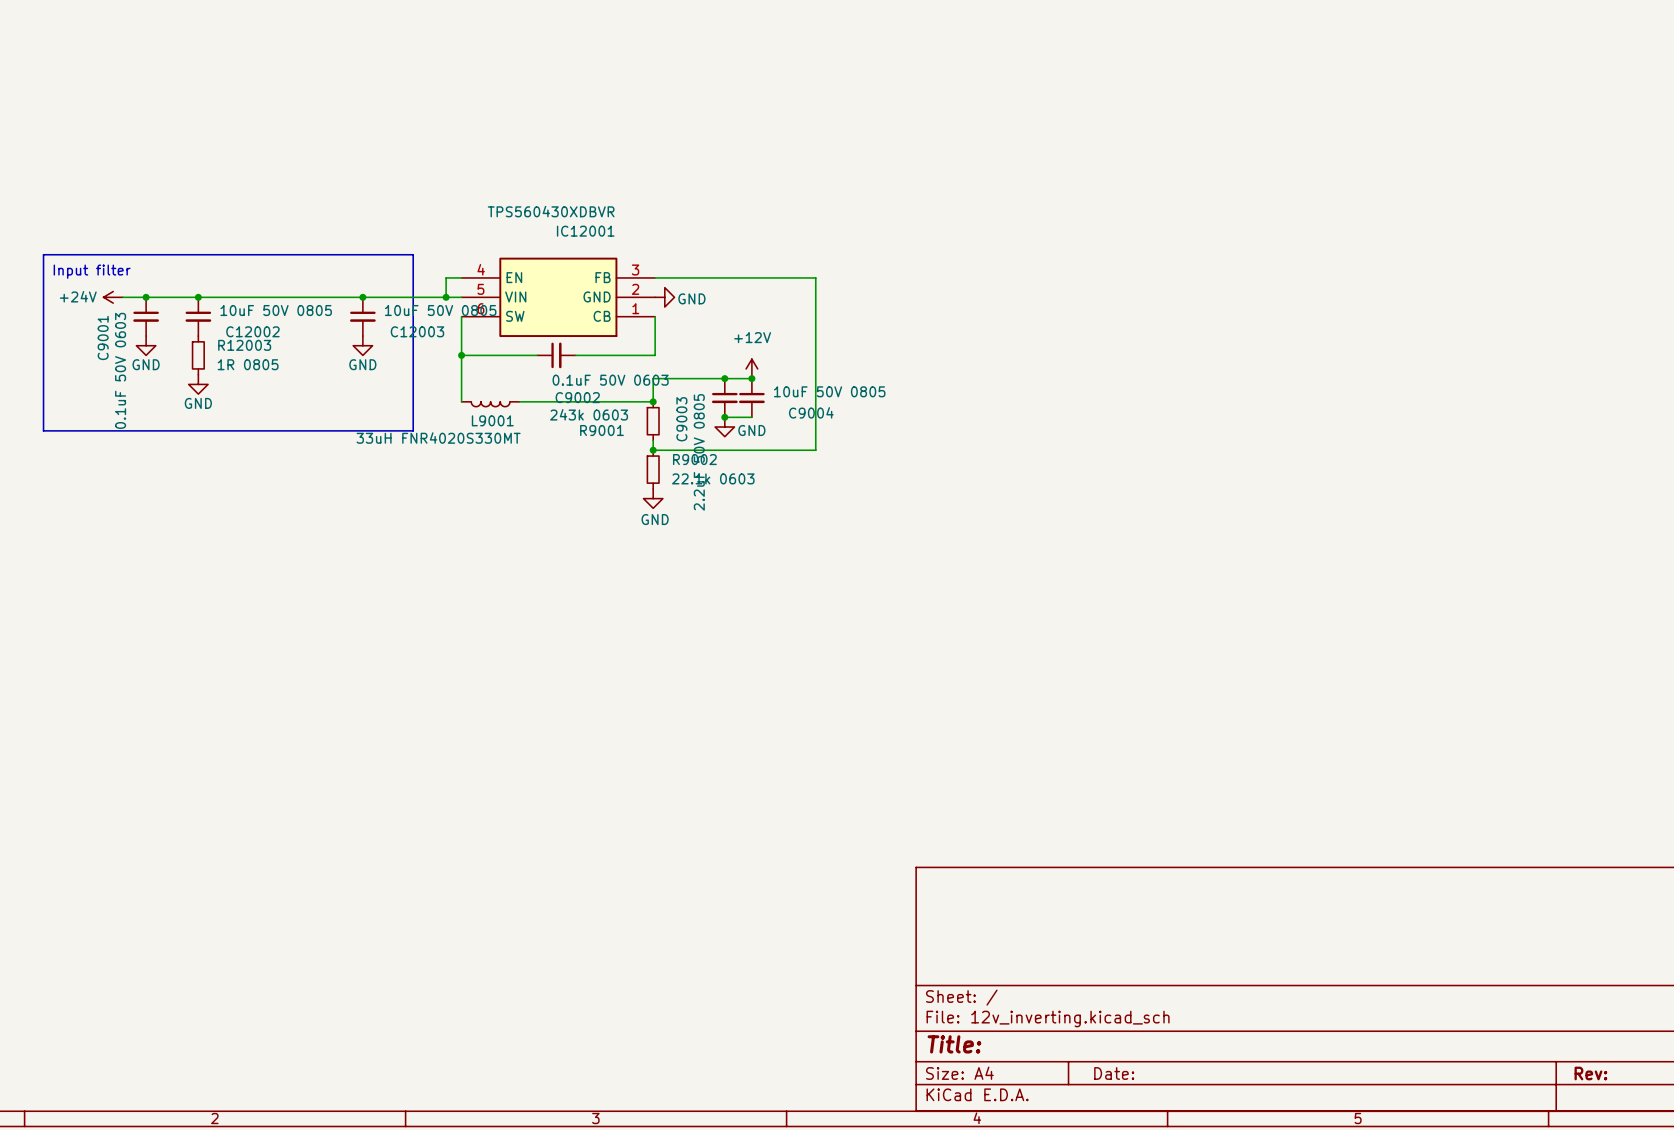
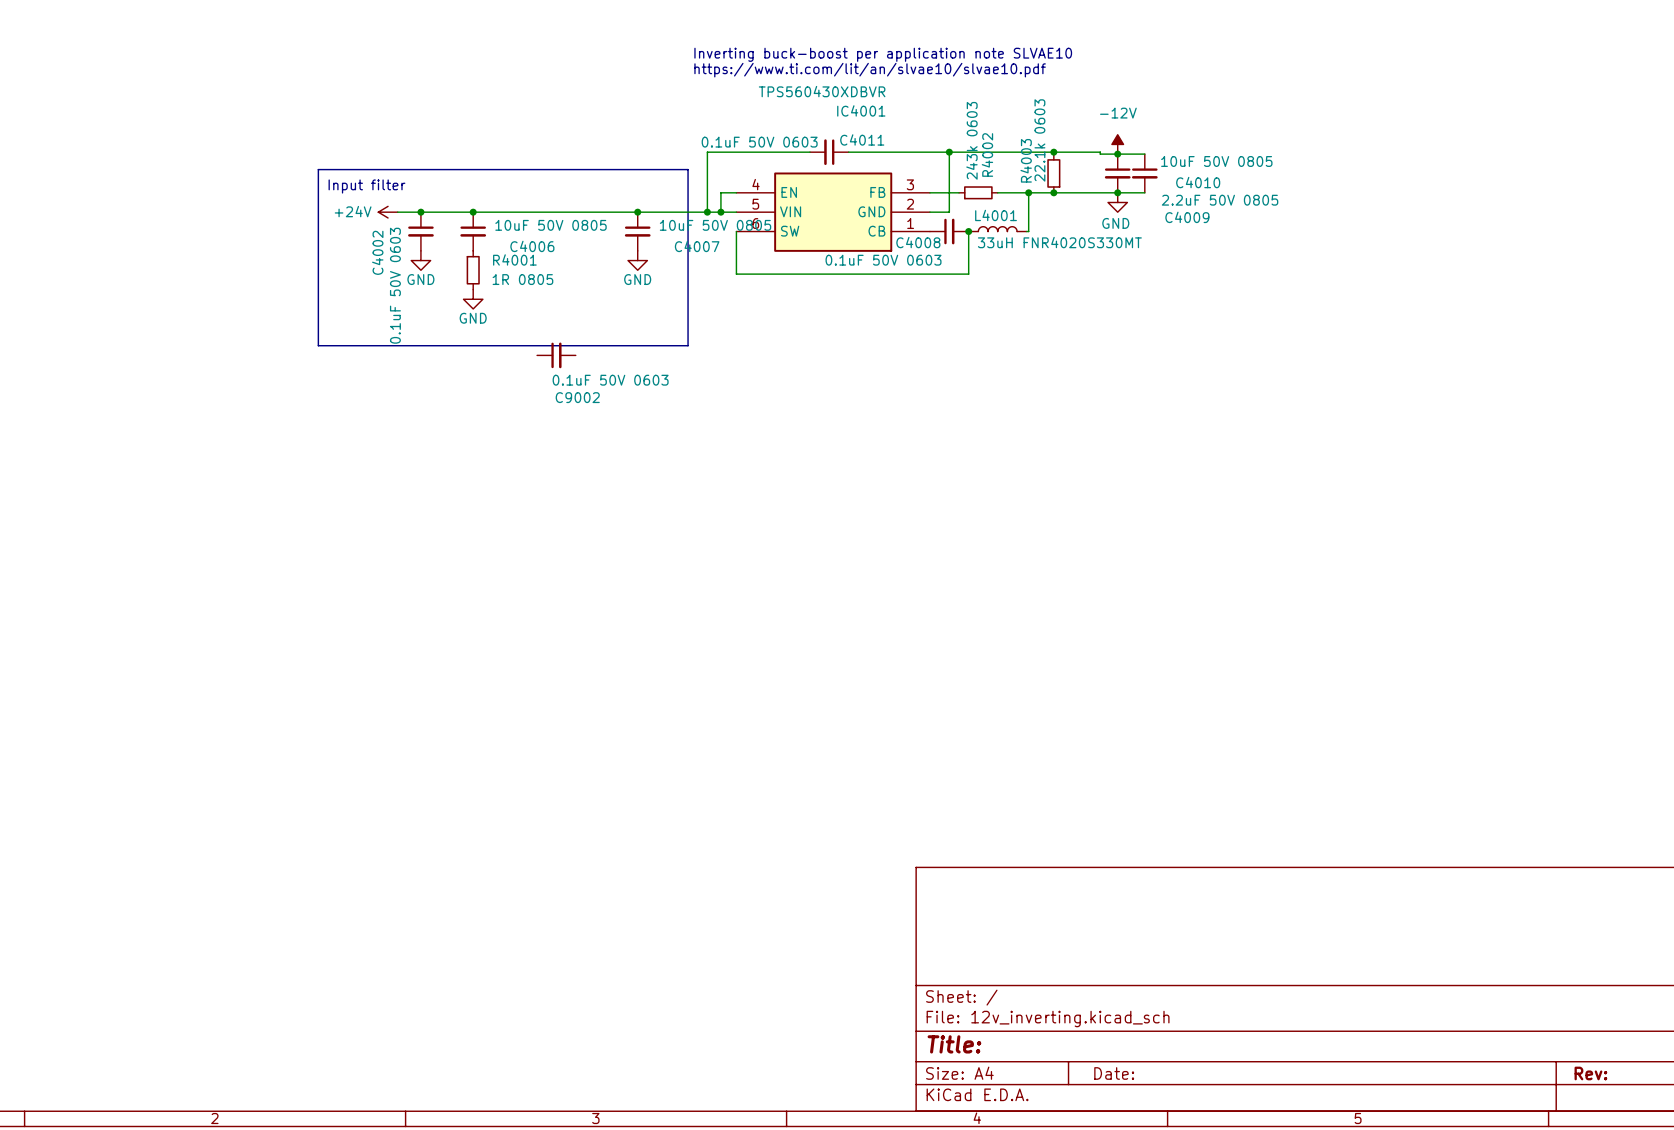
text: none -> Inverting buck-boost per application note SLVAE10 (883, 54)
text: none -> https://www.ti.com/lit/an/slvae10/slvae10.pdf (870, 70)
power symbol: none -> -12V (1117, 144)
wire: none -> (809, 152) (707, 152) (707, 212)
C4011: none -> 0.1uF 50V 0603 (829, 152)
wire: none -> (848, 152) (1100, 152) (1100, 154) (1144, 154)
wire: none -> (949, 152) (949, 212) (929, 212)
junction: none -> (949, 152)
junction: none -> (1053, 152)
junction: none -> (1117, 154)
line: none -> (318, 169) (688, 169) (688, 345) (318, 345) (318, 169)
R4003: none -> 22.1k 0603 (1053, 173)
C4009: none -> 2.2uF 50V 0805 (1117, 173)
C4010: none -> 10uF 50V 0805 (1144, 173)
text: none -> Input filter (366, 186)
wire: none -> (736, 192) (720, 192) (720, 212)
wire: none -> (929, 192) (959, 192)
R4002: none -> 243k 0603 (978, 192)
wire: none -> (997, 192) (1144, 192)
wire: none -> (1028, 192) (1028, 231) (1026, 231)
junction: none -> (1028, 192)
junction: none -> (1053, 192)
junction: none -> (1117, 192)
power symbol: none -> GND (1117, 202)
power symbol: none -> +24V (388, 212)
wire: none -> (397, 212) (736, 212)
junction: none -> (420, 212)
junction: none -> (473, 212)
junction: none -> (637, 212)
junction: none -> (707, 212)
junction: none -> (720, 212)
IC4001: none -> TPS560430XDBVR (833, 212)
L4001: none -> 33uH FNR4020S330MT (997, 229)
C4002: none -> 0.1uF 50V 0603 (420, 231)
C4006: none -> 10uF 50V 0805 (473, 231)
C4007: none -> 10uF 50V 0805 (637, 231)
wire: none -> (736, 231) (736, 274) (968, 274) (968, 231)
C4008: none -> 0.1uF 50V 0603 (949, 231)
junction: none -> (968, 231)
line: (43, 254) (413, 254) (413, 430) (43, 430) (43, 254) -> none
power symbol: none -> GND (420, 260)
R4001: none -> 1R 0805 (473, 270)
text: Input filter (92, 271) -> none
wire: (461, 277) (446, 277) (446, 297) -> none
wire: (655, 277) (815, 277) (815, 450) (653, 450) (653, 440) -> none
power symbol: +24V (113, 297) -> none
wire: (122, 297) (461, 297) -> none
junction: (146, 297) -> none
junction: (198, 297) -> none
junction: (362, 297) -> none
junction: (446, 297) -> none
IC12001: TPS560430XDBVR (558, 297) -> none
power symbol rotation: 0° (664, 297) -> 90° clockwise (637, 260)
power symbol position: GND (664, 297) -> GND (637, 260)
power symbol: none -> GND (473, 299)
C9001: 0.1uF 50V 0603 (146, 316) -> none
C12002: 10uF 50V 0805 (198, 316) -> none
C12003: 10uF 50V 0805 (362, 316) -> none
wire: (461, 316) (461, 401) -> none
wire: (655, 316) (655, 355) (575, 355) -> none
power symbol: GND (146, 345) -> none
power symbol: GND (362, 345) -> none
R12003: 1R 0805 (198, 355) -> none
wire: (461, 355) (537, 355) -> none
junction: (461, 355) -> none
power symbol: +12V (751, 368) -> none
junction: (724, 378) -> none
wire: (751, 378) (653, 378) (653, 401) (519, 401) -> none
junction: (751, 378) -> none
power symbol: GND (198, 384) -> none
C9003: 2.2uF 50V 0805 (724, 397) -> none
C9004: 10uF 50V 0805 (751, 397) -> none
junction: (653, 401) -> none
L9001: 33uH FNR4020S330MT (490, 404) -> none
wire: (724, 417) (751, 417) -> none
junction: (724, 417) -> none
R9001: 243k 0603 (653, 421) -> none
power symbol: GND (724, 427) -> none
junction: (653, 450) -> none
R9002: 22.1k 0603 (653, 469) -> none
power symbol: GND (653, 498) -> none

